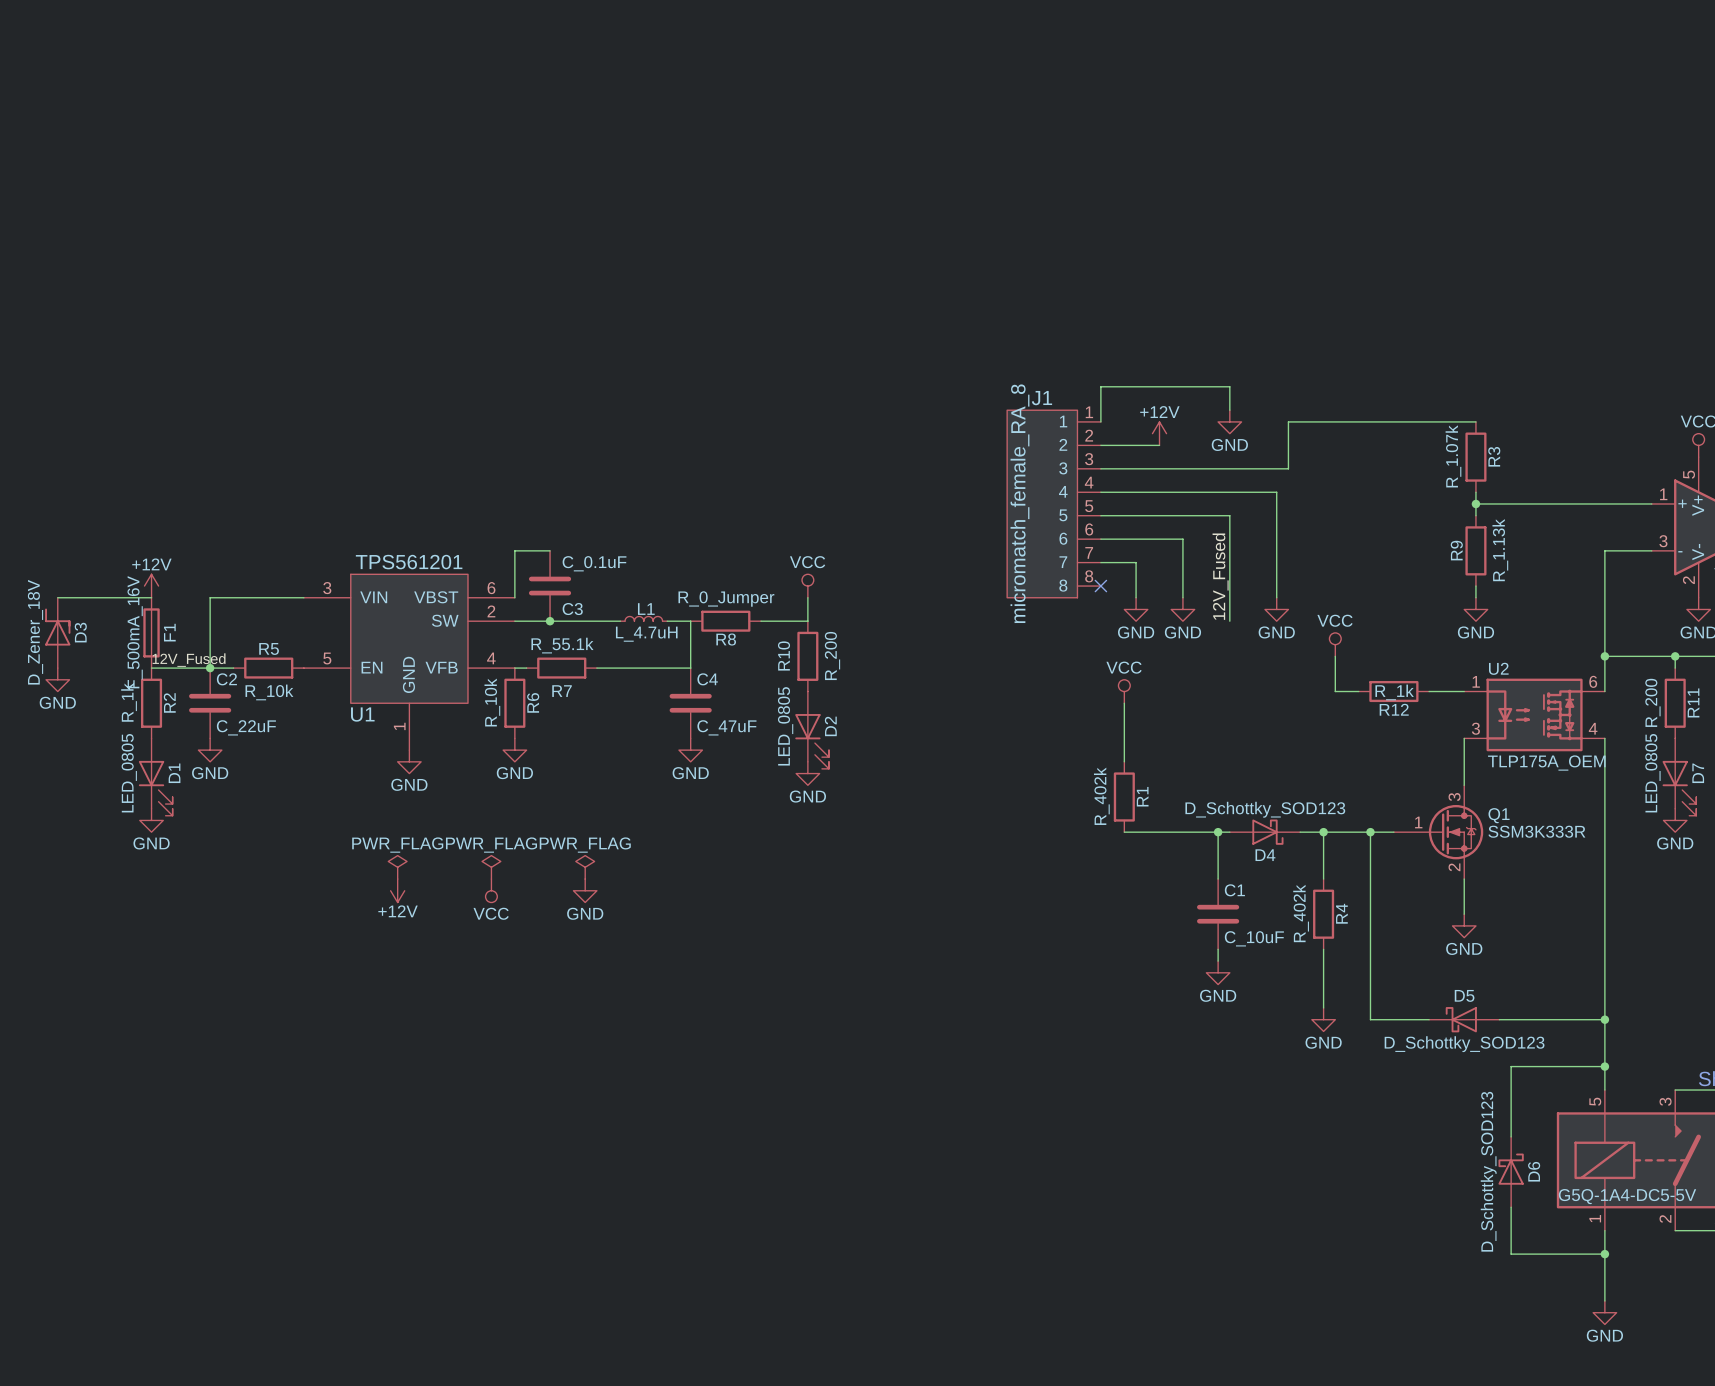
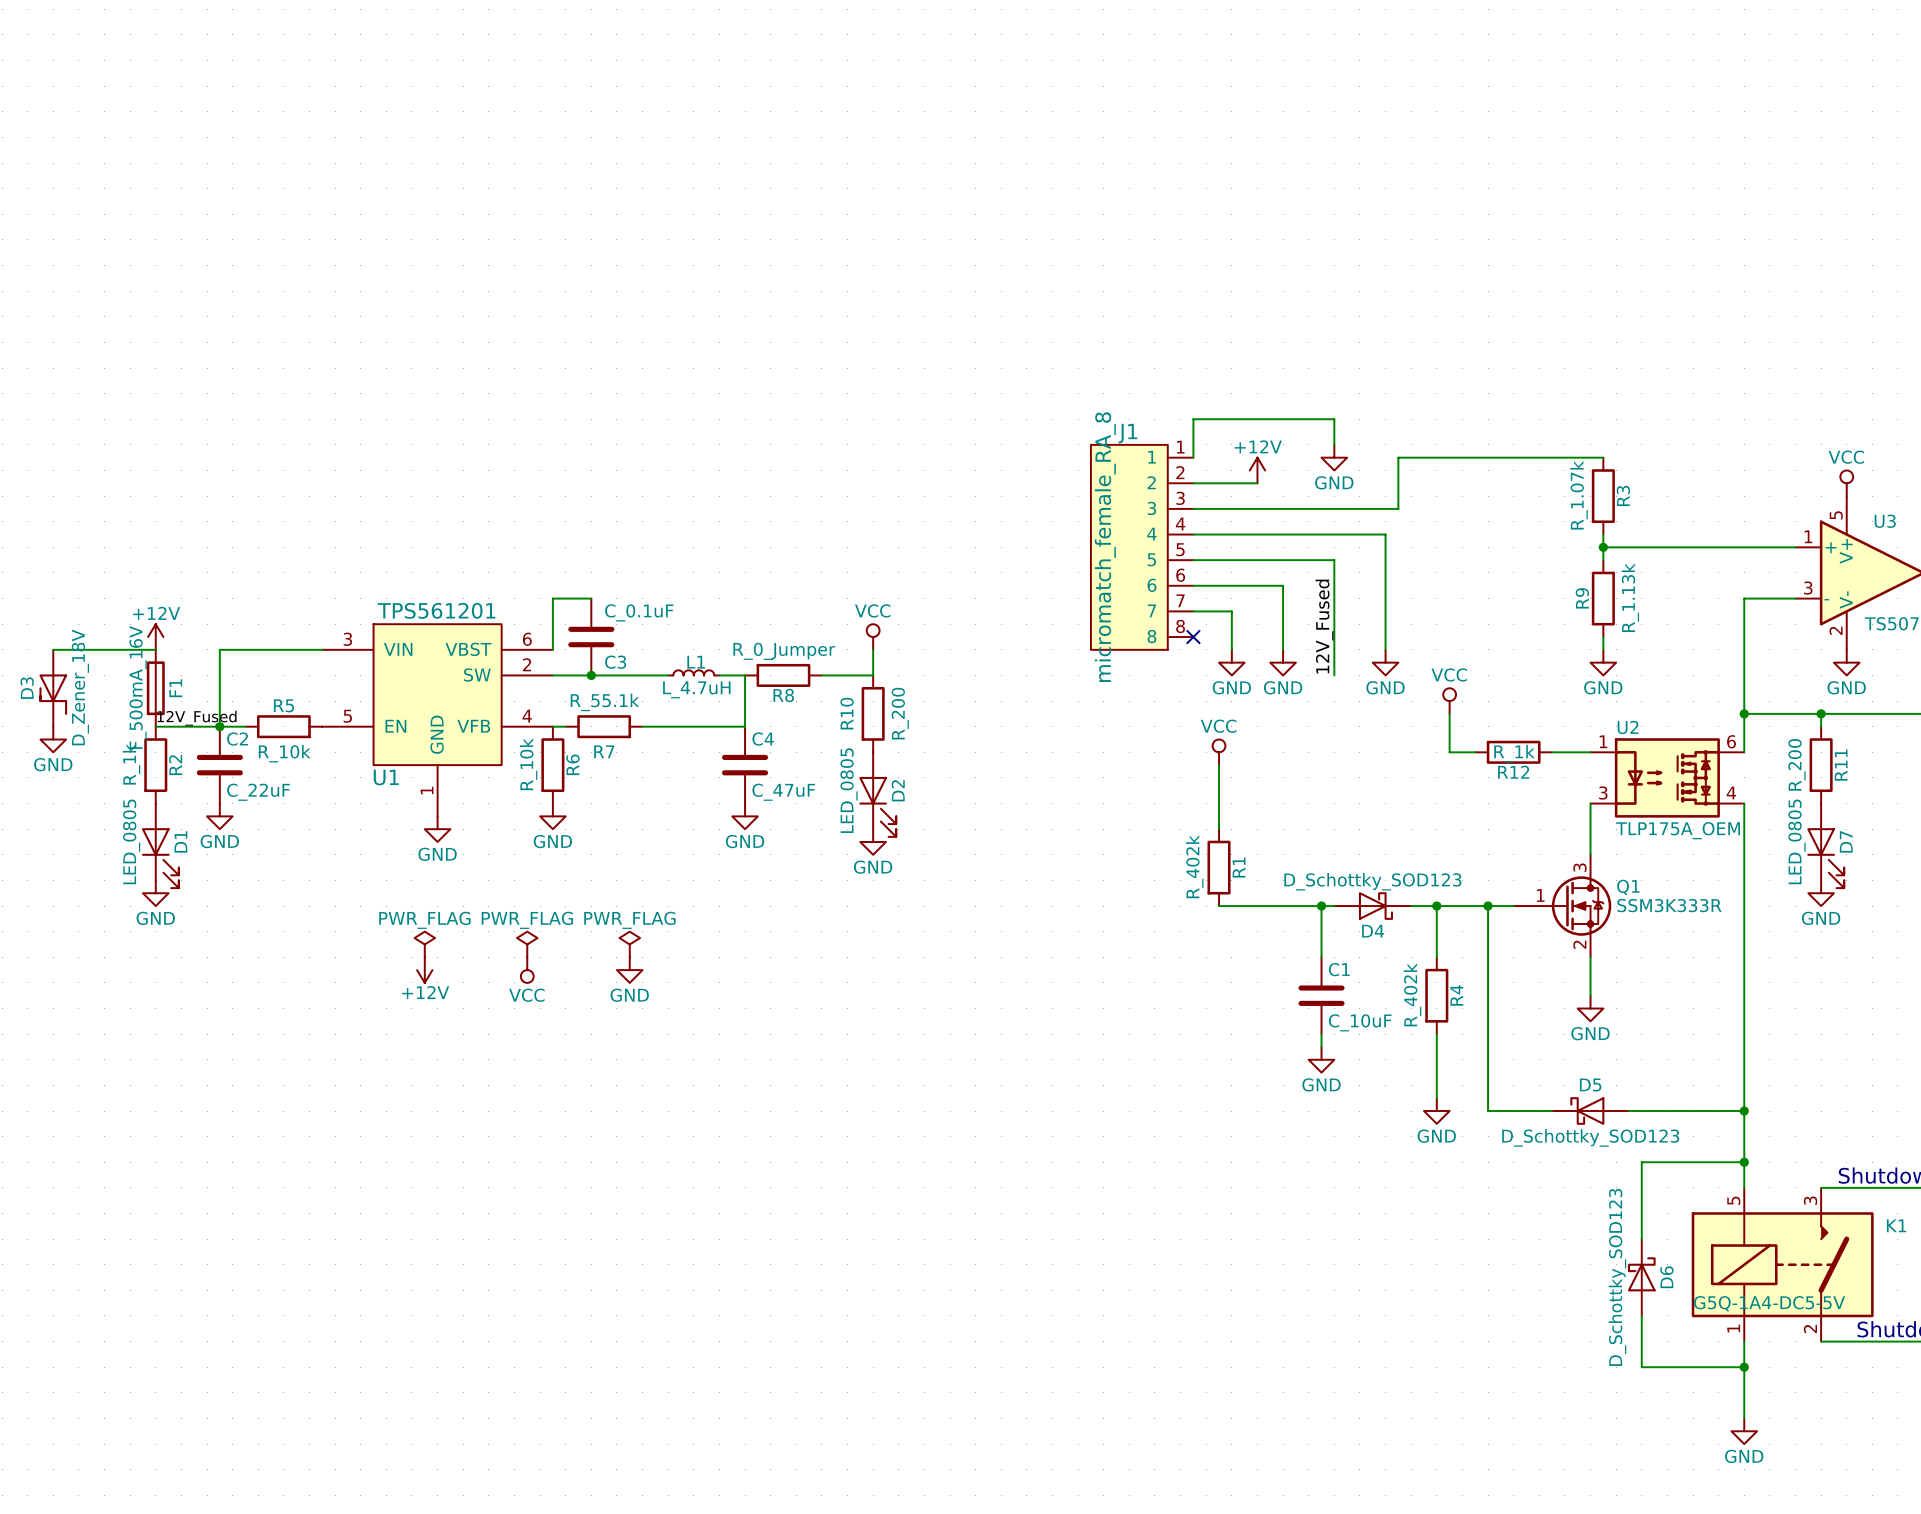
D3 rotation: 0° (57, 627) -> 180° (53, 694)

